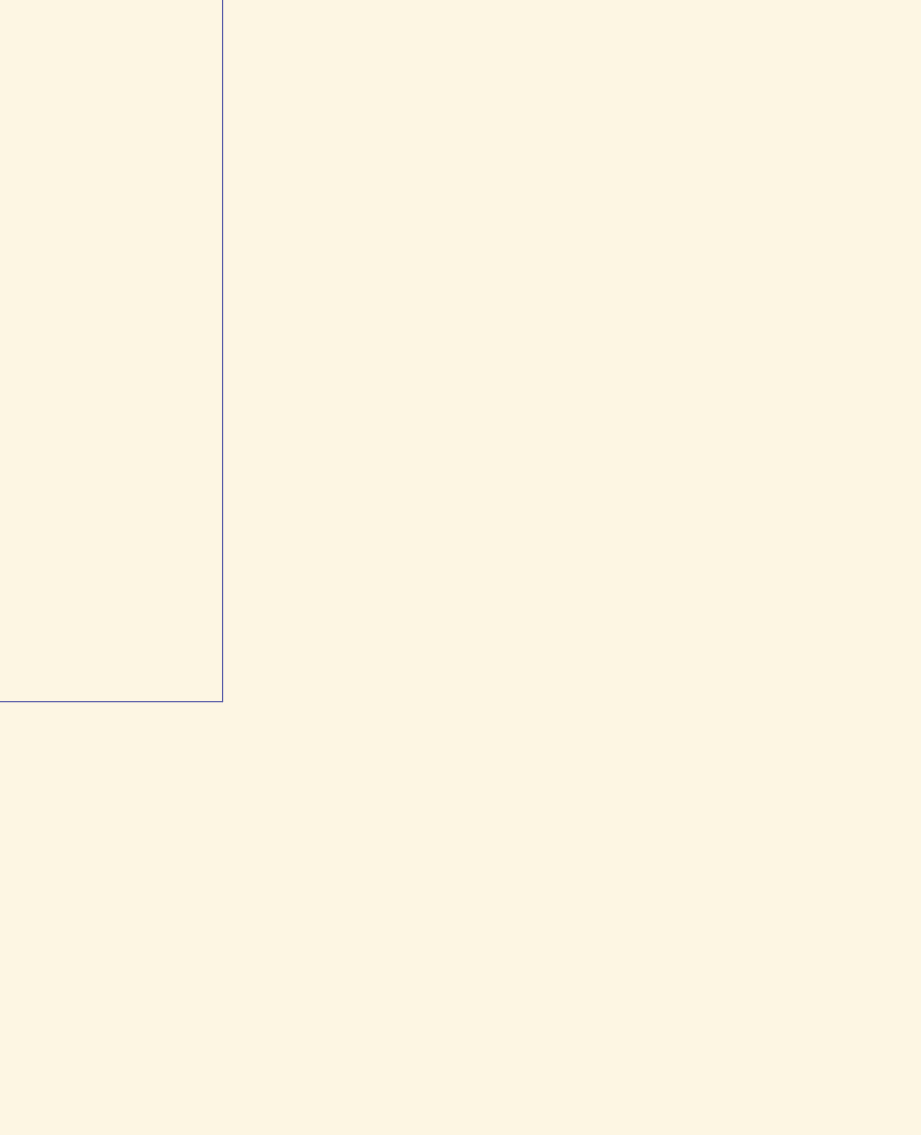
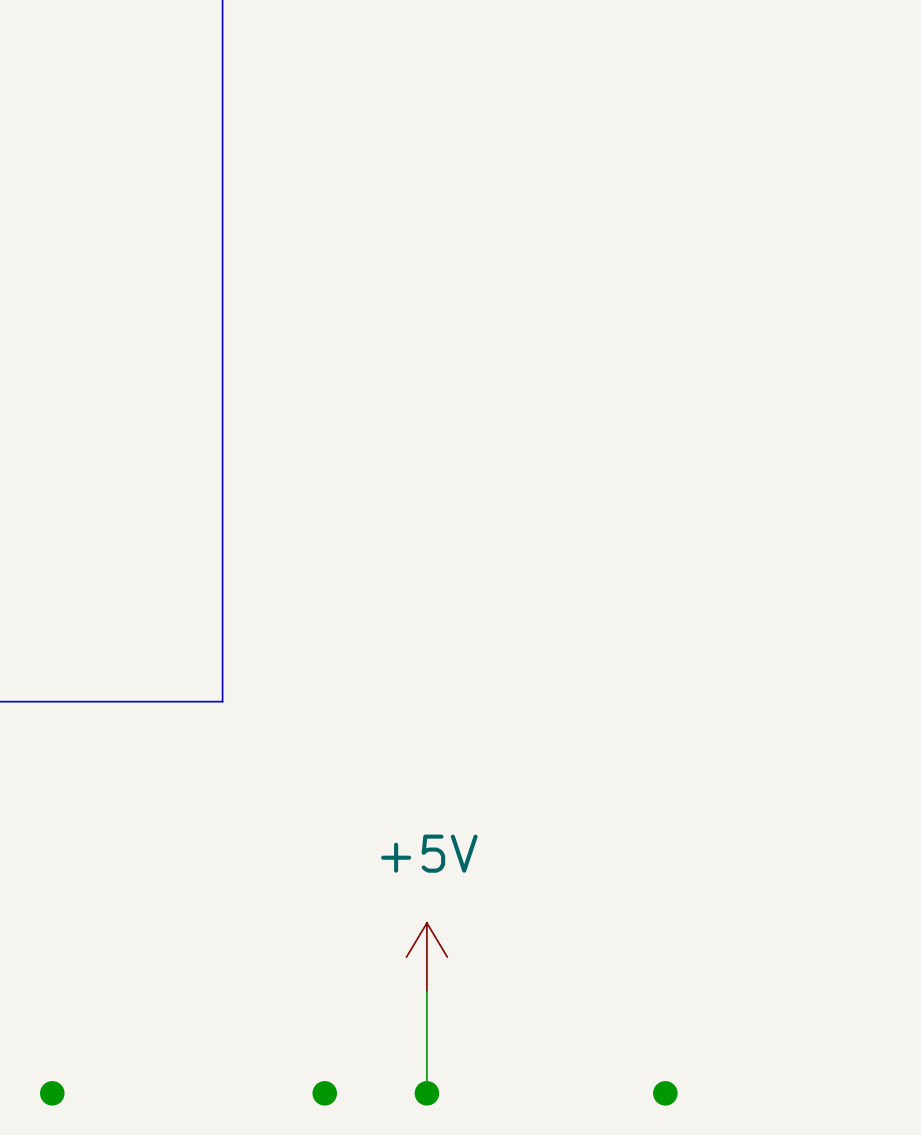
power symbol: none -> +5V (426, 957)
wire: none -> (426, 991) (426, 1093)
junction: none -> (52, 1093)
junction: none -> (324, 1093)
junction: none -> (426, 1093)
junction: none -> (665, 1093)

